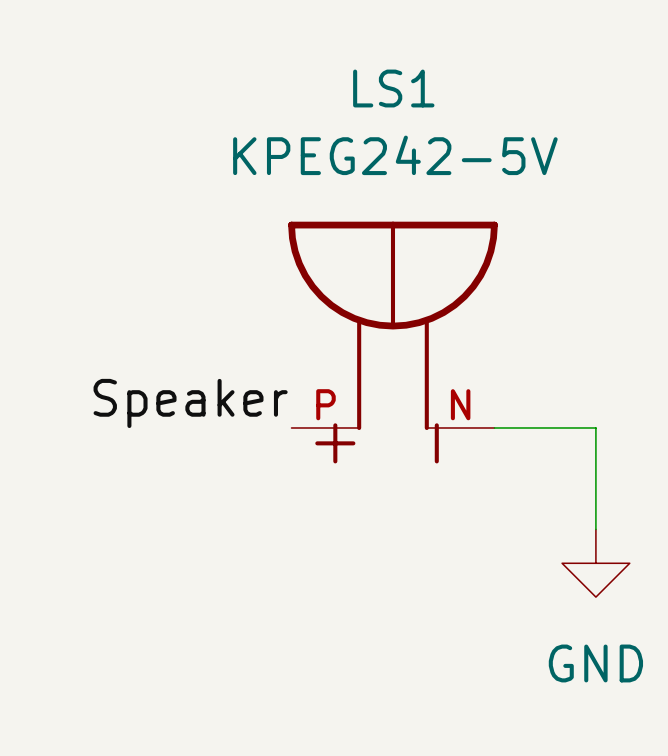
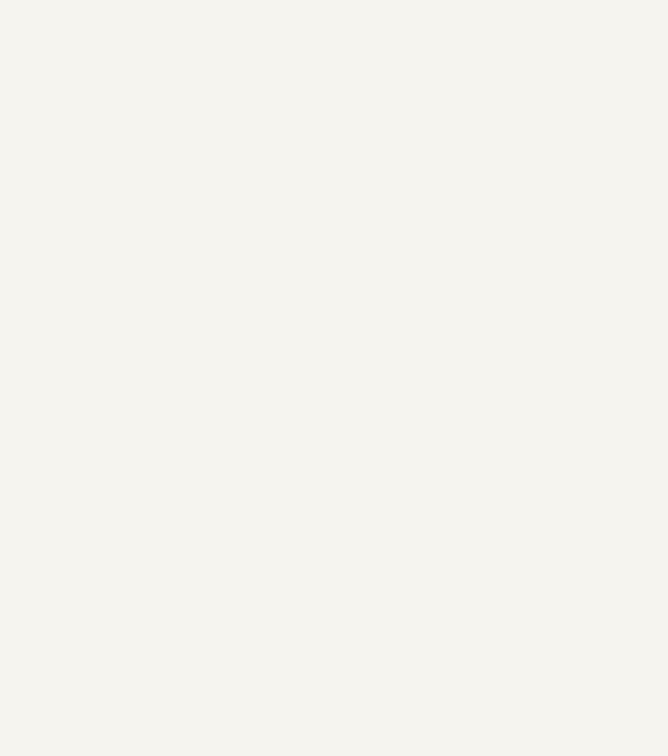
LS1: KPEG242-5V (392, 325) -> none
label: Speaker (190, 403) -> none
wire: (494, 427) (595, 427) (595, 529) -> none
power symbol: GND (595, 563) -> none

